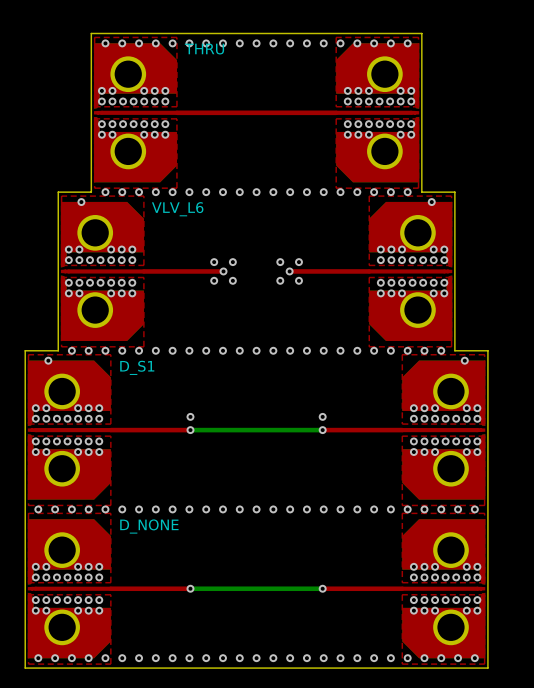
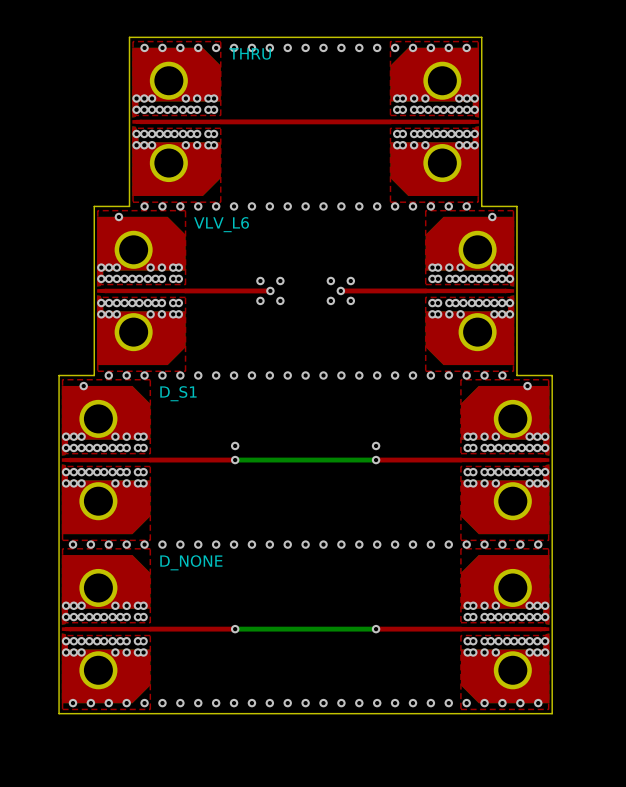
via: none -> (136, 98)
via: (101, 90) -> none
via: none -> (144, 98)
via: none -> (214, 98)
via: none -> (397, 98)
via: none -> (466, 98)
via: (411, 90) -> none
via: none -> (474, 98)
via: none -> (136, 109)
via: (101, 101) -> none
via: none -> (144, 109)
via: none -> (159, 109)
via: (123, 101) -> none
via: none -> (167, 109)
via: none -> (183, 109)
via: (144, 101) -> none
via: none -> (190, 109)
via: none -> (214, 109)
via: none -> (397, 109)
via: none -> (420, 109)
via: (368, 101) -> none
via: none -> (428, 109)
via: none -> (443, 109)
via: (390, 101) -> none
via: none -> (451, 109)
via: none -> (466, 109)
via: (411, 101) -> none
via: none -> (474, 109)
via: none -> (136, 133)
via: (101, 124) -> none
via: none -> (144, 133)
via: none -> (159, 133)
via: (123, 124) -> none
via: none -> (167, 133)
via: none -> (183, 133)
via: (144, 124) -> none
via: none -> (190, 133)
via: none -> (214, 133)
via: none -> (397, 133)
via: none -> (420, 133)
via: (368, 124) -> none
via: none -> (428, 133)
via: none -> (443, 133)
via: (390, 124) -> none
via: none -> (451, 133)
via: none -> (466, 133)
via: (411, 124) -> none
via: none -> (474, 133)
via: none -> (136, 145)
via: (101, 134) -> none
via: none -> (144, 145)
via: none -> (214, 145)
via: none -> (397, 145)
via: none -> (466, 145)
via: (411, 134) -> none
via: none -> (474, 145)
via: none -> (101, 267)
via: (68, 249) -> none
via: none -> (109, 267)
via: none -> (178, 267)
via: none -> (432, 267)
via: none -> (502, 267)
via: (444, 249) -> none
via: none -> (509, 267)
via: none -> (101, 278)
via: (68, 260) -> none
via: none -> (109, 278)
via: none -> (124, 278)
via: (90, 260) -> none
via: none -> (132, 278)
via: none -> (147, 278)
via: (111, 260) -> none
via: none -> (155, 278)
via: none -> (178, 278)
via: none -> (432, 278)
via: none -> (455, 278)
via: (402, 260) -> none
via: none -> (463, 278)
via: none -> (478, 278)
via: (423, 260) -> none
via: none -> (486, 278)
via: none -> (502, 278)
via: (444, 260) -> none
via: none -> (509, 278)
via: none -> (101, 303)
via: (68, 282) -> none
via: none -> (109, 303)
via: none -> (124, 303)
via: (90, 282) -> none
via: none -> (132, 303)
via: none -> (147, 303)
via: (111, 282) -> none
via: none -> (155, 303)
via: none -> (178, 303)
via: none -> (432, 303)
via: none -> (455, 303)
via: (402, 282) -> none
via: none -> (463, 303)
via: none -> (478, 303)
via: (423, 282) -> none
via: none -> (486, 303)
via: none -> (502, 303)
via: (444, 282) -> none
via: none -> (509, 303)
via: none -> (101, 314)
via: (68, 293) -> none
via: none -> (109, 314)
via: none -> (178, 314)
via: none -> (432, 314)
via: none -> (502, 314)
via: (444, 293) -> none
via: none -> (509, 314)
via: none -> (66, 436)
via: (35, 408) -> none
via: none -> (73, 436)
via: none -> (143, 436)
via: none -> (467, 436)
via: none -> (537, 436)
via: (477, 408) -> none
via: none -> (545, 436)
via: none -> (66, 447)
via: (35, 418) -> none
via: none -> (73, 447)
via: none -> (89, 447)
via: (56, 418) -> none
via: none -> (97, 447)
via: none -> (112, 447)
via: (78, 418) -> none
via: none -> (120, 447)
via: none -> (143, 447)
via: none -> (467, 447)
via: none -> (490, 447)
via: (435, 418) -> none
via: none -> (498, 447)
via: none -> (514, 447)
via: (456, 418) -> none
via: none -> (521, 447)
via: none -> (537, 447)
via: (477, 418) -> none
via: none -> (545, 447)
via: none -> (66, 472)
via: (35, 441) -> none
via: none -> (73, 472)
via: none -> (89, 472)
via: (56, 441) -> none
via: none -> (97, 472)
via: none -> (112, 472)
via: (78, 441) -> none
via: none -> (120, 472)
via: none -> (143, 472)
via: none -> (467, 472)
via: none -> (490, 472)
via: (435, 441) -> none
via: none -> (498, 472)
via: none -> (514, 472)
via: (456, 441) -> none
via: none -> (521, 472)
via: none -> (537, 472)
via: (477, 441) -> none
via: none -> (545, 472)
via: none -> (66, 483)
via: (35, 452) -> none
via: none -> (73, 483)
via: none -> (143, 483)
via: none -> (467, 483)
via: none -> (537, 483)
via: (477, 452) -> none
via: none -> (545, 483)
via: none -> (66, 605)
via: (35, 566) -> none
via: none -> (73, 605)
via: none -> (143, 605)
via: none -> (467, 605)
via: none -> (537, 605)
via: (477, 566) -> none
via: none -> (545, 605)
via: none -> (66, 617)
via: (35, 577) -> none
via: none -> (73, 617)
via: none -> (89, 617)
via: (56, 577) -> none
via: none -> (97, 617)
via: none -> (112, 617)
via: (78, 577) -> none
via: none -> (120, 617)
via: none -> (143, 617)
via: none -> (467, 617)
via: none -> (490, 617)
via: (435, 577) -> none
via: none -> (498, 617)
via: none -> (514, 617)
via: (456, 577) -> none
via: none -> (521, 617)
via: none -> (537, 617)
via: (477, 577) -> none
via: none -> (545, 617)
via: none -> (66, 641)
via: (35, 600) -> none
via: none -> (73, 641)
via: none -> (89, 641)
via: (56, 600) -> none
via: none -> (97, 641)
via: none -> (112, 641)
via: (78, 600) -> none
via: none -> (120, 641)
via: none -> (143, 641)
via: none -> (467, 641)
via: none -> (490, 641)
via: (435, 600) -> none
via: none -> (498, 641)
via: none -> (514, 641)
via: (456, 600) -> none
via: none -> (521, 641)
via: none -> (537, 641)
via: (477, 600) -> none
via: none -> (545, 641)
via: none -> (66, 652)
via: (35, 610) -> none
via: none -> (73, 652)
via: none -> (143, 652)
via: none -> (467, 652)
via: none -> (537, 652)
via: (477, 610) -> none
via: none -> (545, 652)

